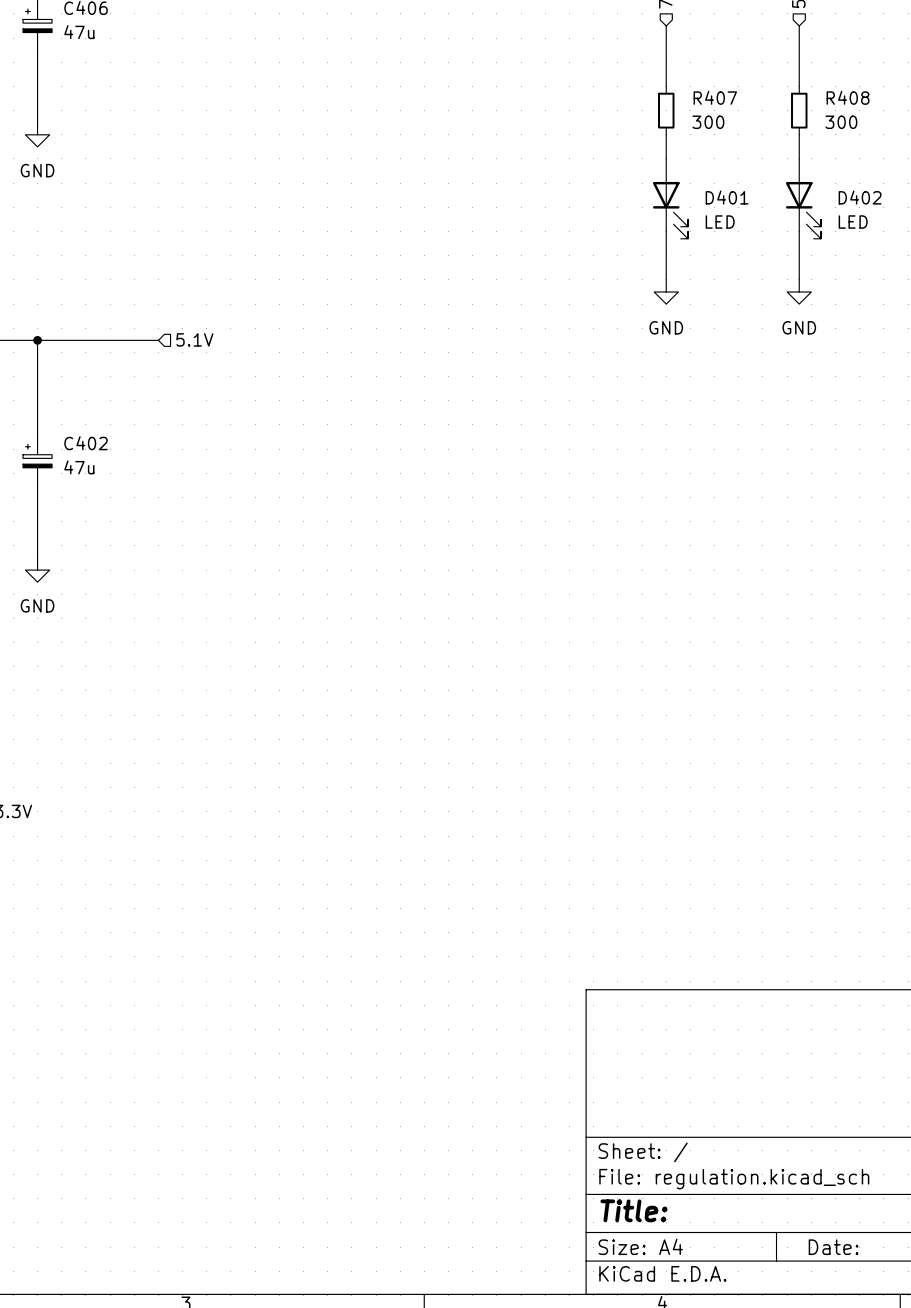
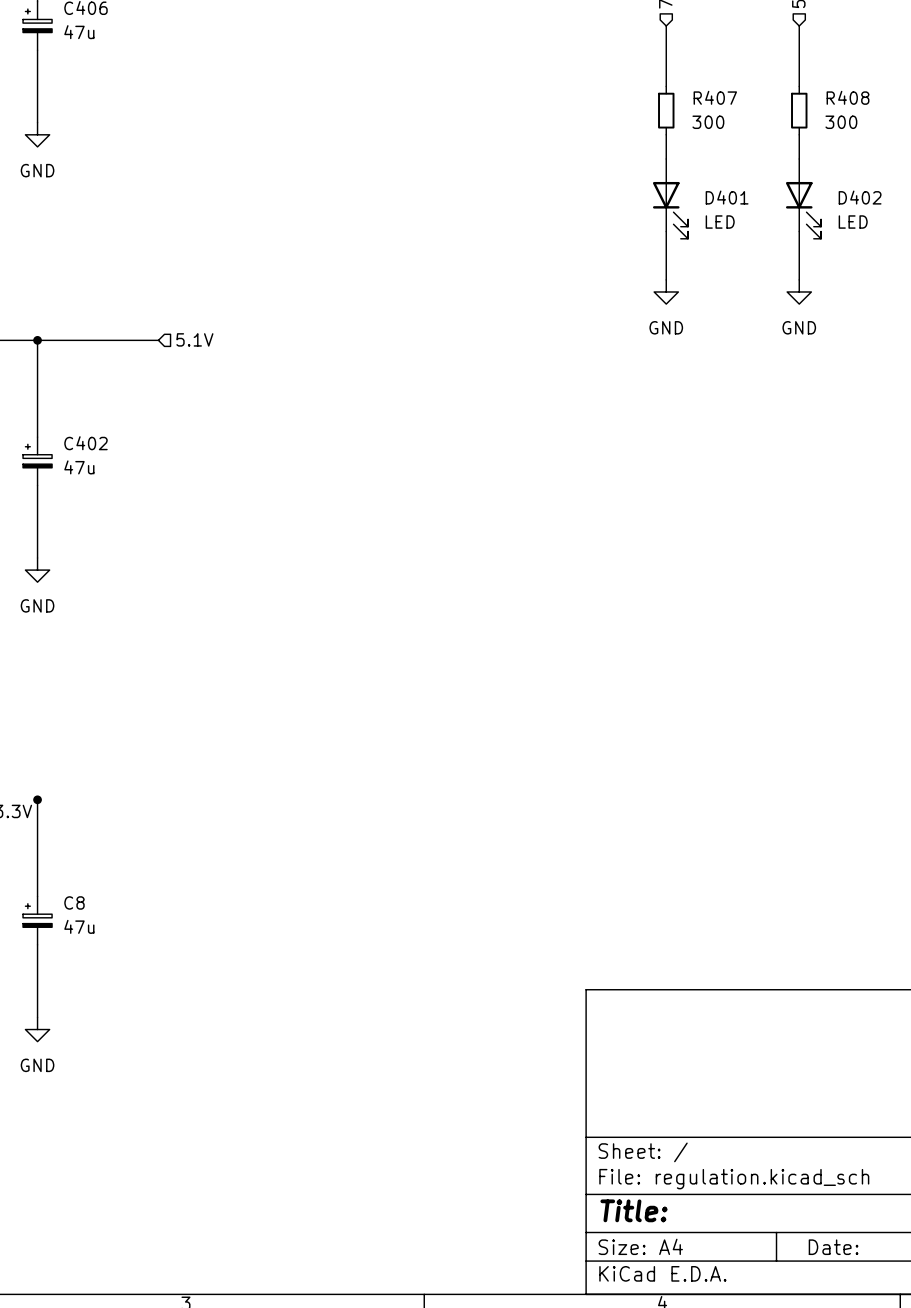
wire: none -> (37, 799) (37, 896)
junction: none -> (37, 799)
C8: none -> 47u (37, 920)
wire: none -> (37, 944) (37, 1017)
power symbol: none -> GND (37, 1029)

